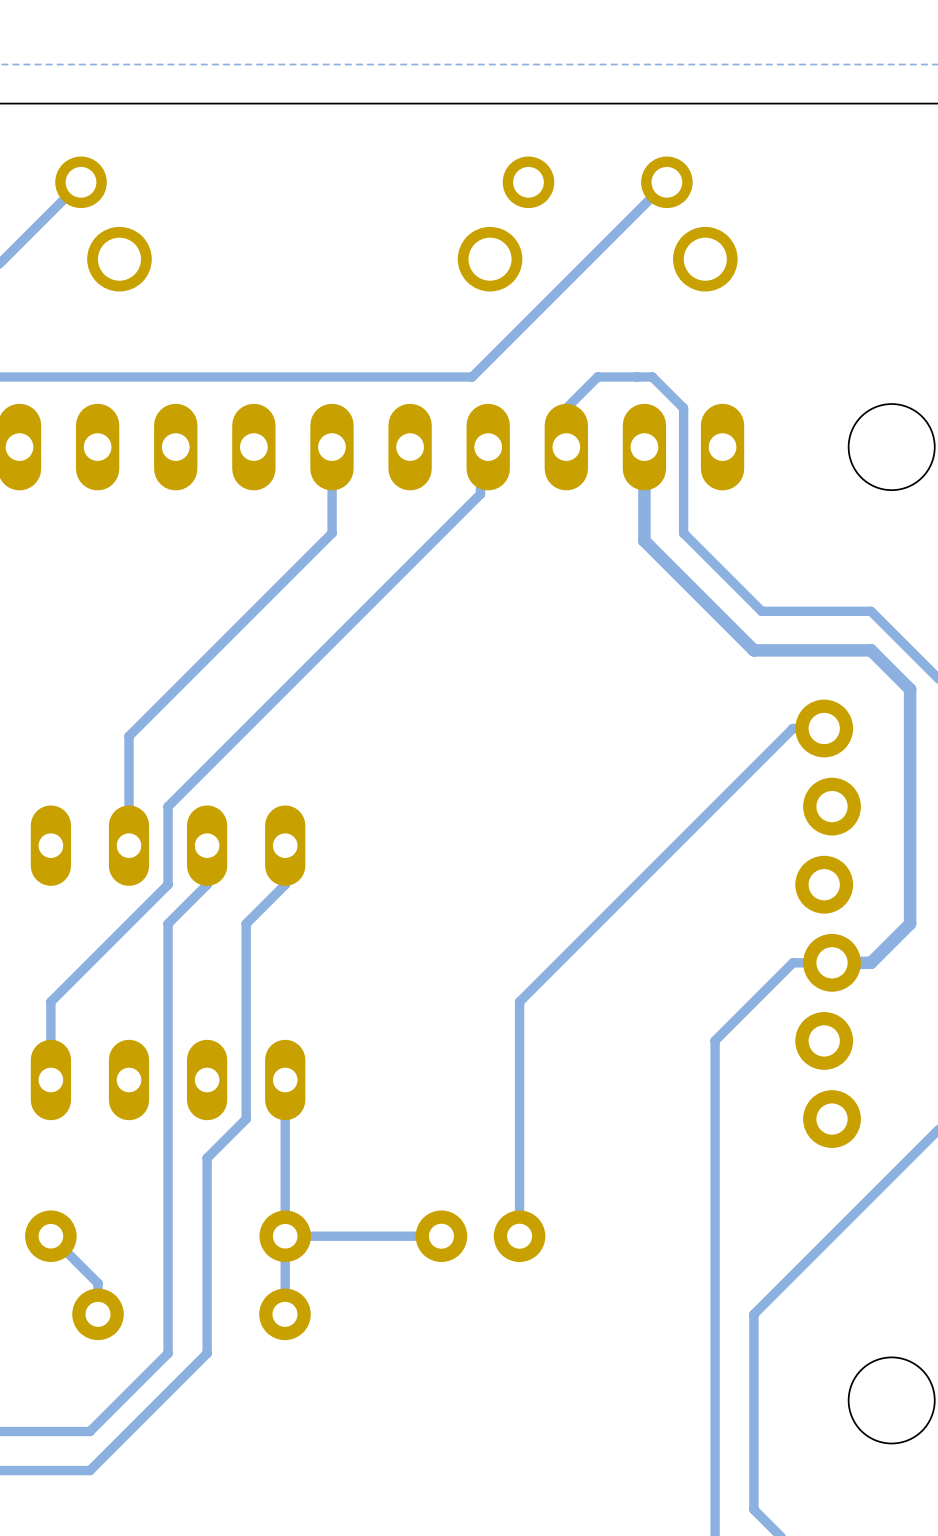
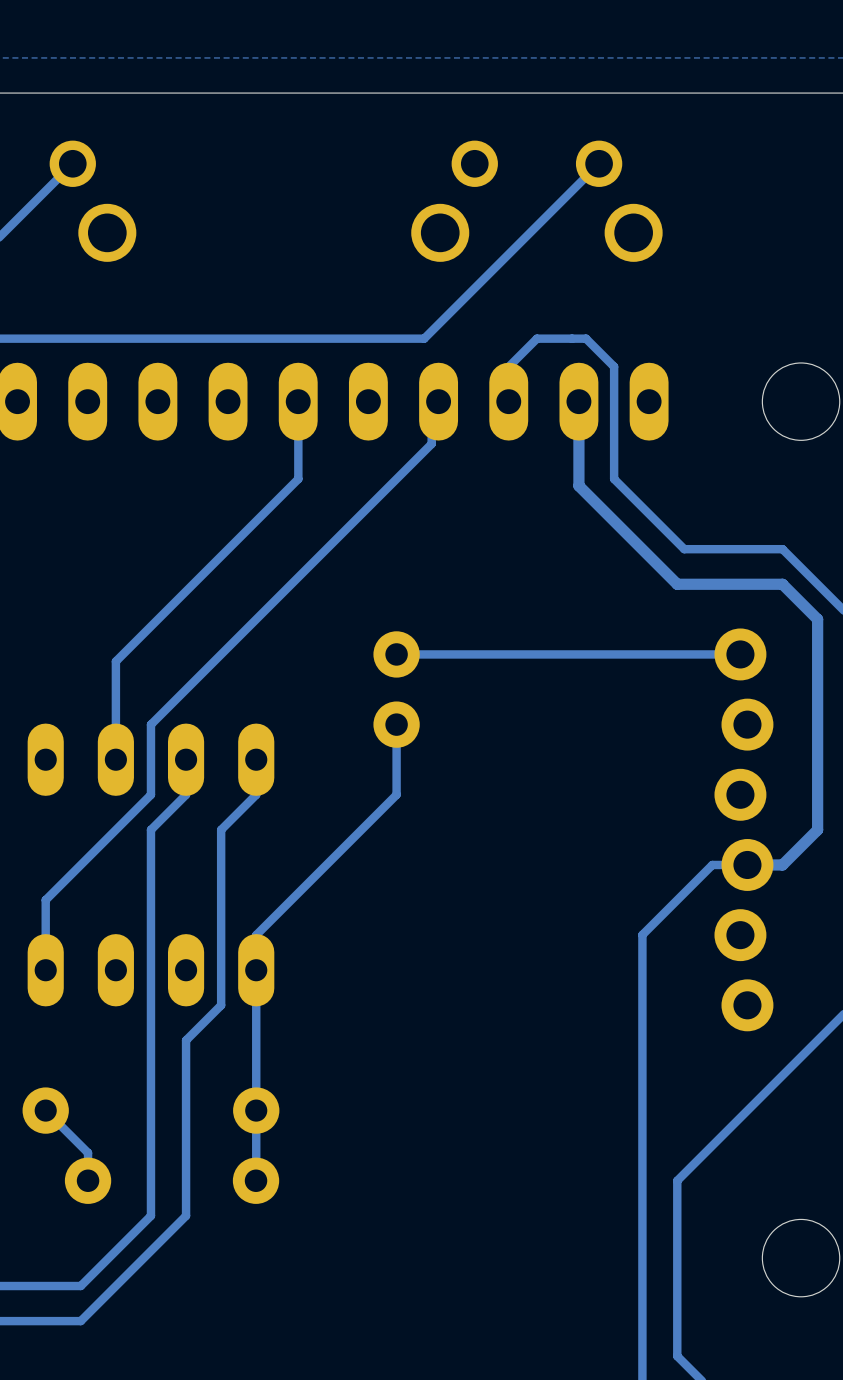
track: (792, 728) (519, 1001) (519, 1236) -> (712, 654) (396, 654)
track: none -> (396, 724) (396, 794) (256, 935) (256, 970)
track: (441, 1236) (285, 1236) -> none
part rotation: 0° (480, 1236) -> 90° clockwise (396, 689)
part position: (480, 1236) -> (396, 689)

